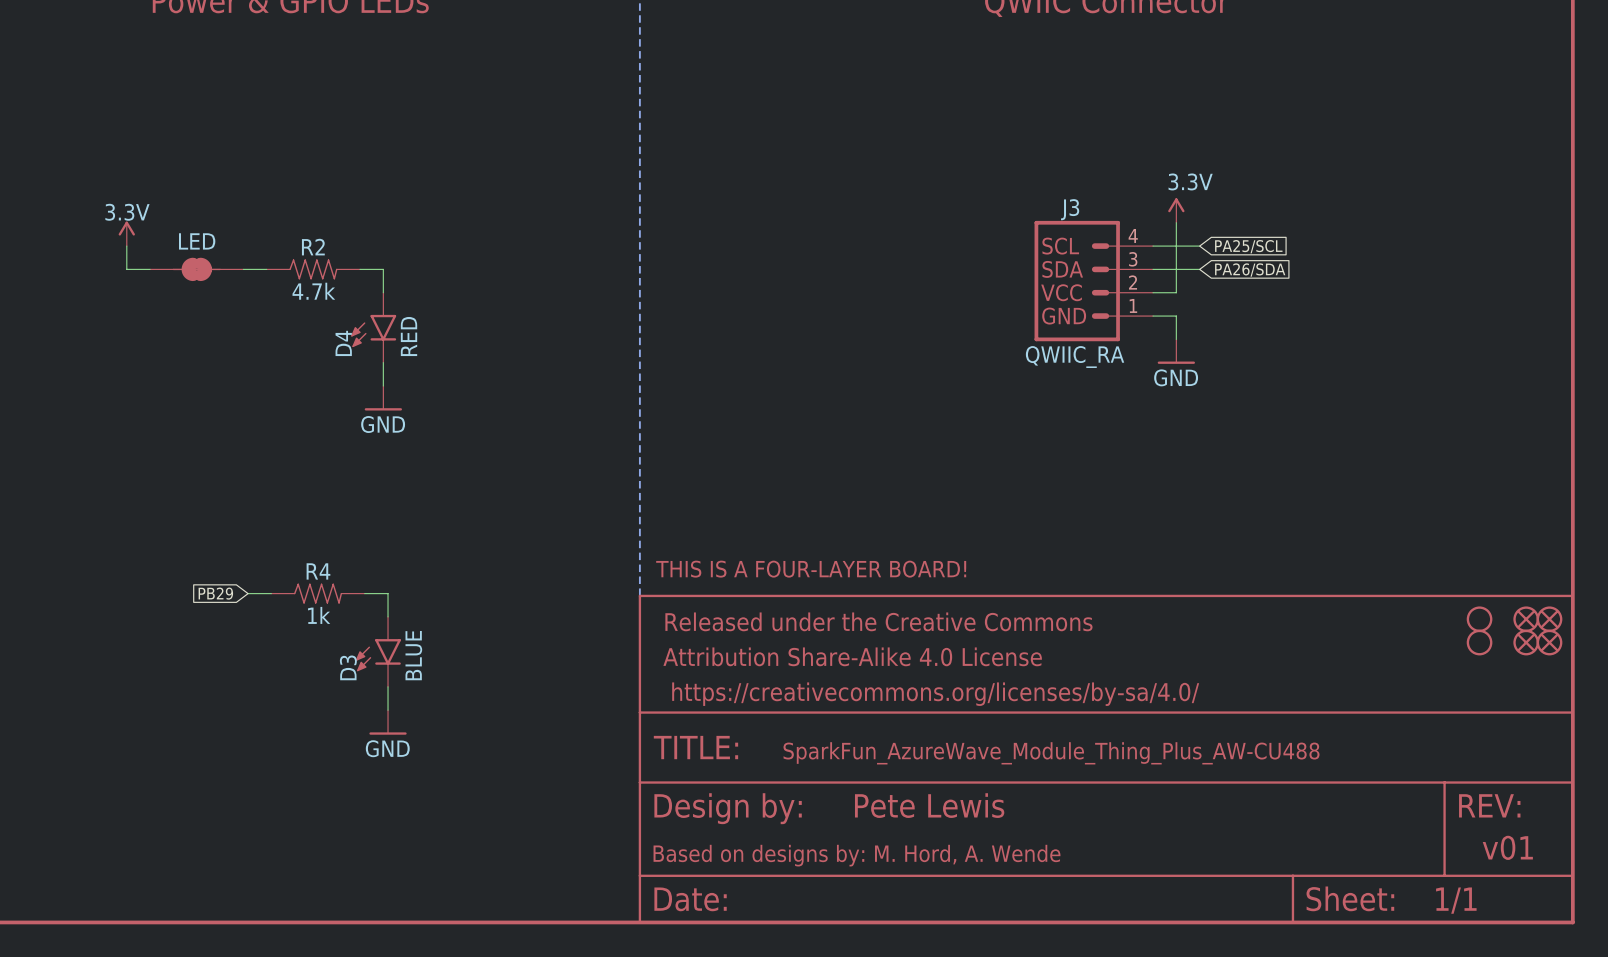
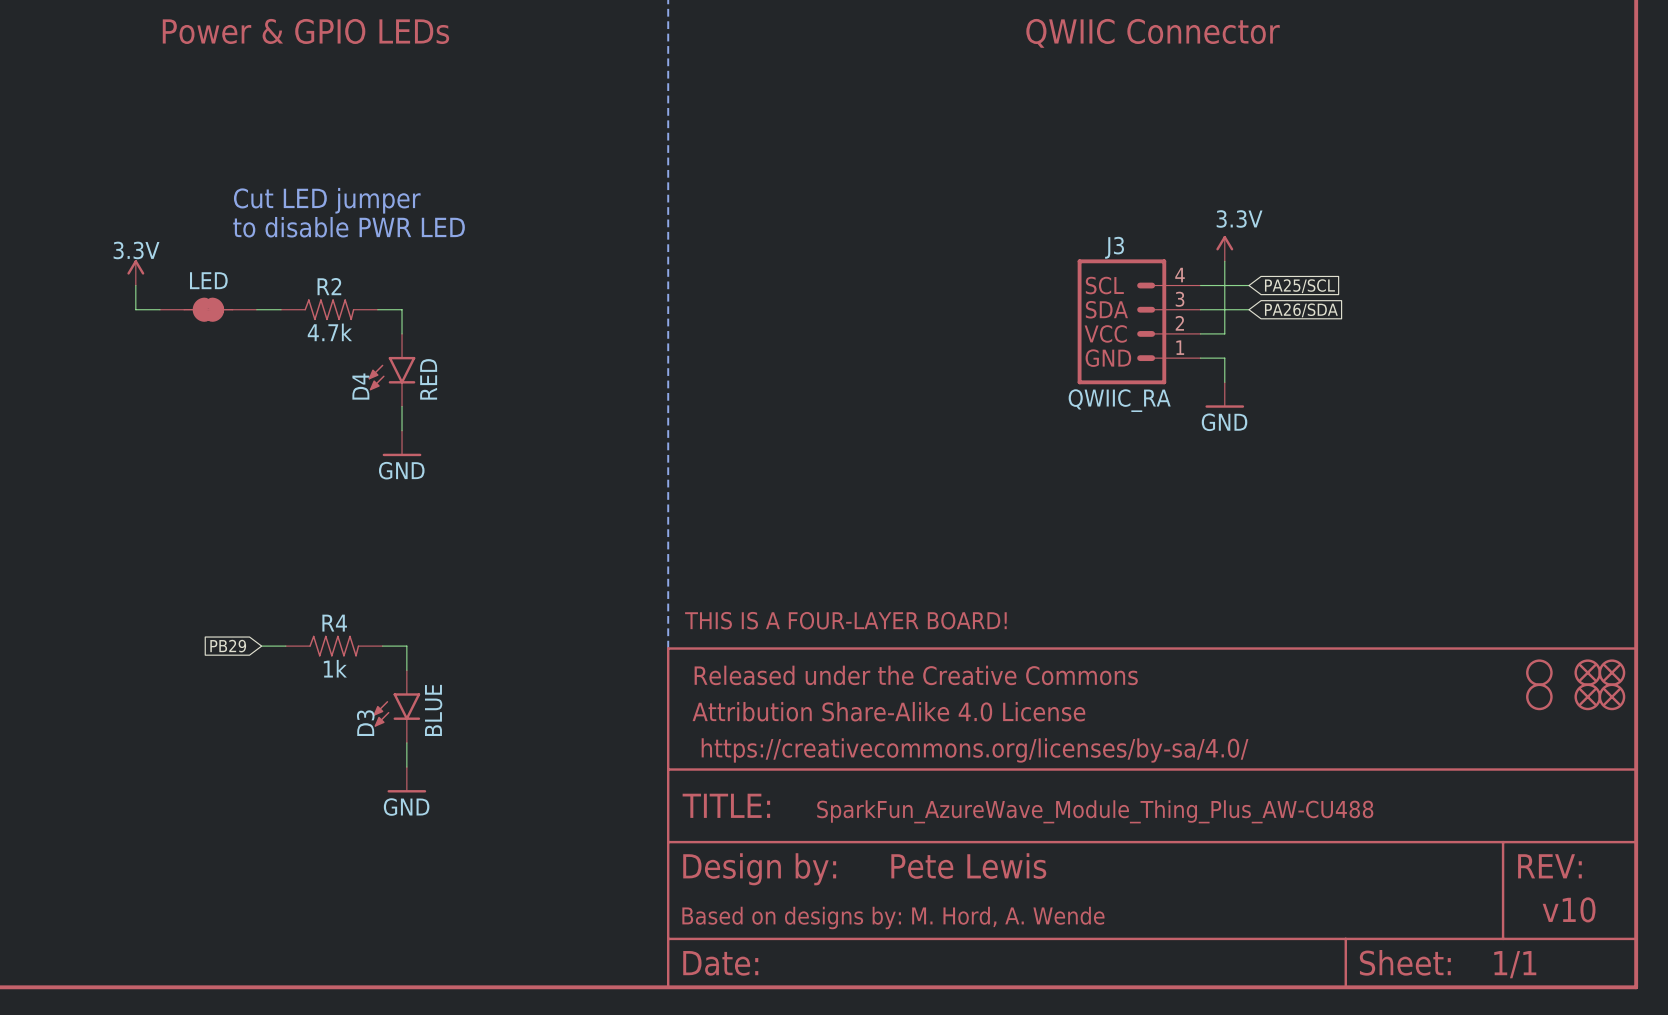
text: none -> Cut LED jumper (327, 200)
text: none -> to disable PWR LED (349, 227)
text: v01 (1507, 847) -> v10 (1569, 909)

